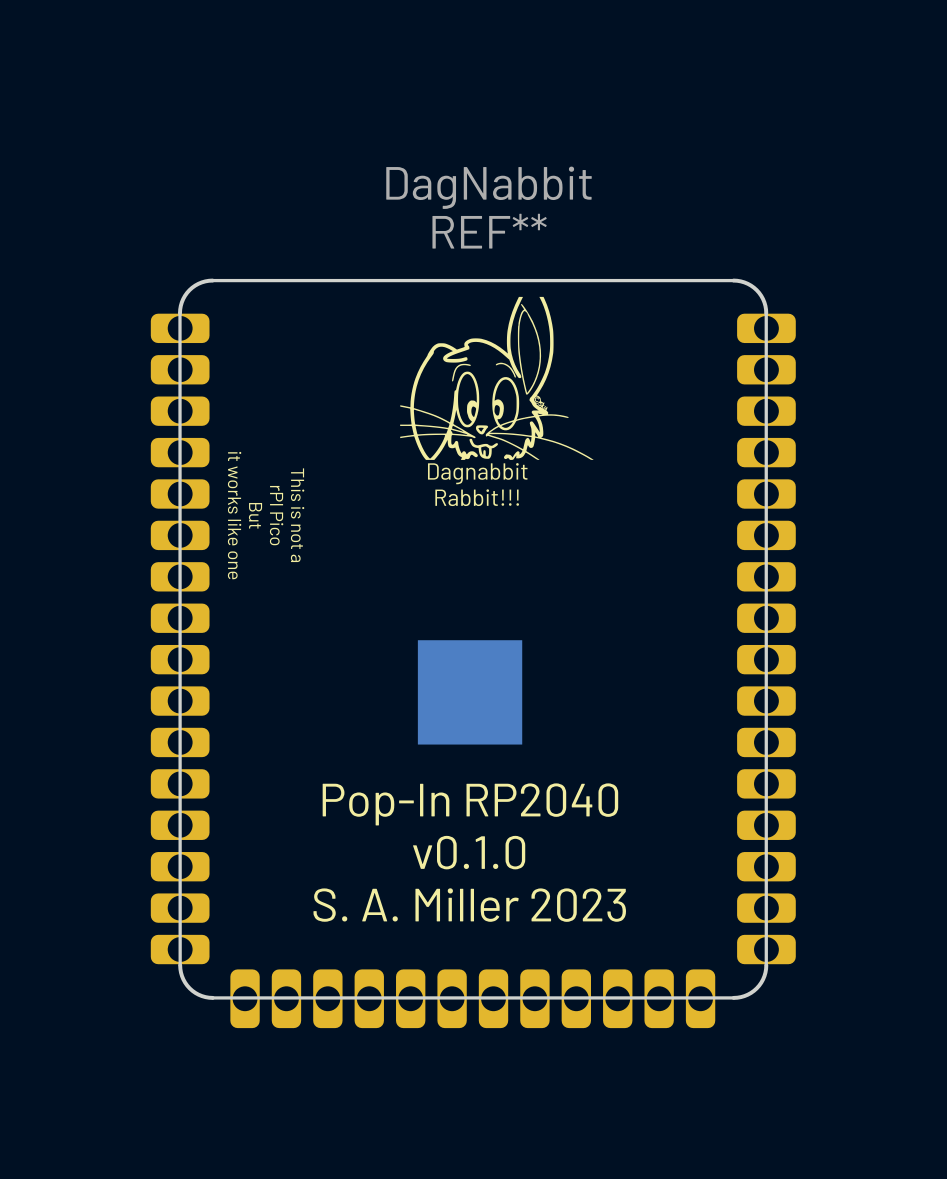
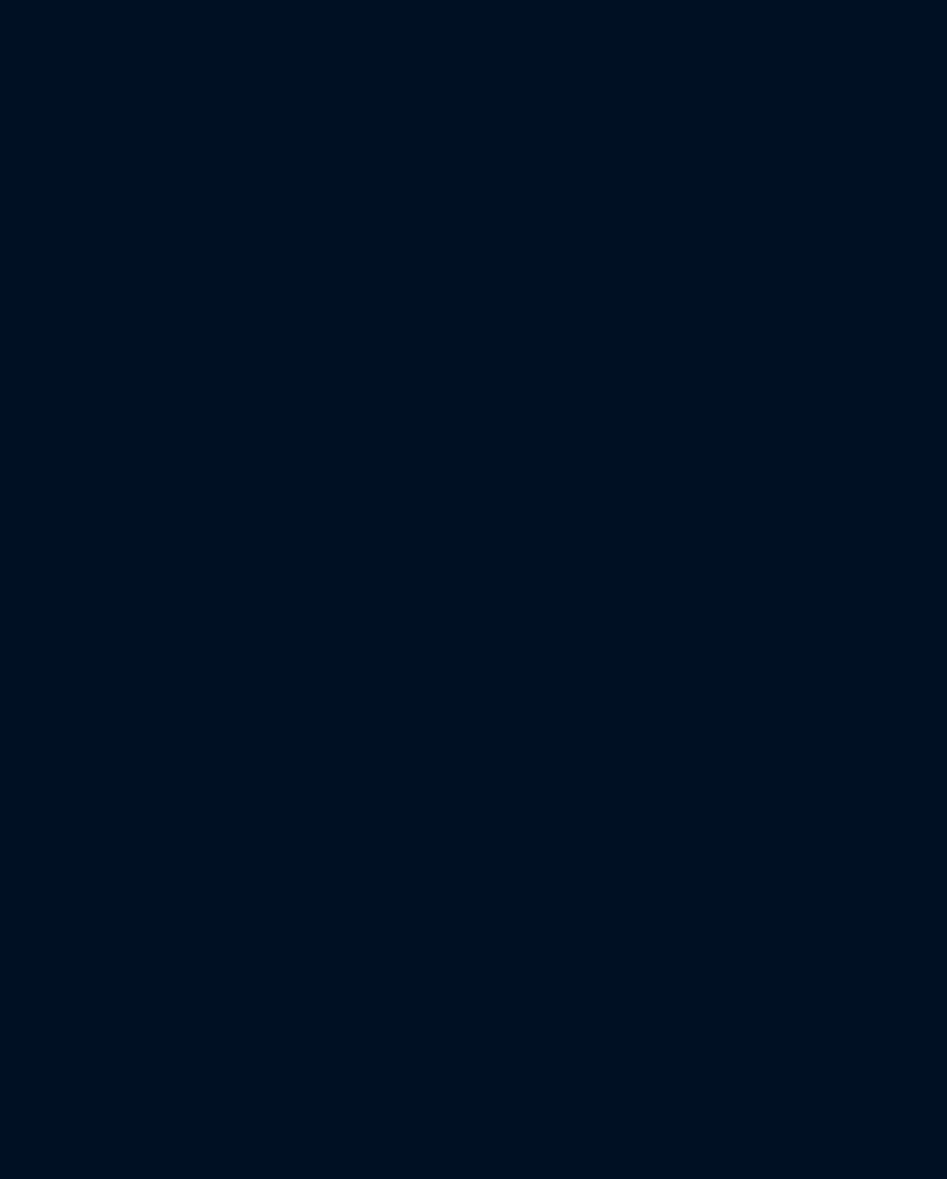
REF**: DagNabbit (496, 378) -> none
text: it works like one (234, 515) -> none
text: But (255, 515) -> none
text: rPI Pico (276, 515) -> none
text: This is not a (297, 515) -> none
part: (473, 653) -> none
part: (470, 692) -> none
text: Pop-In RP2040 (470, 804) -> none
text: v0.1.0 (469, 852) -> none
text: S. A. Miller 2023 (469, 905) -> none

